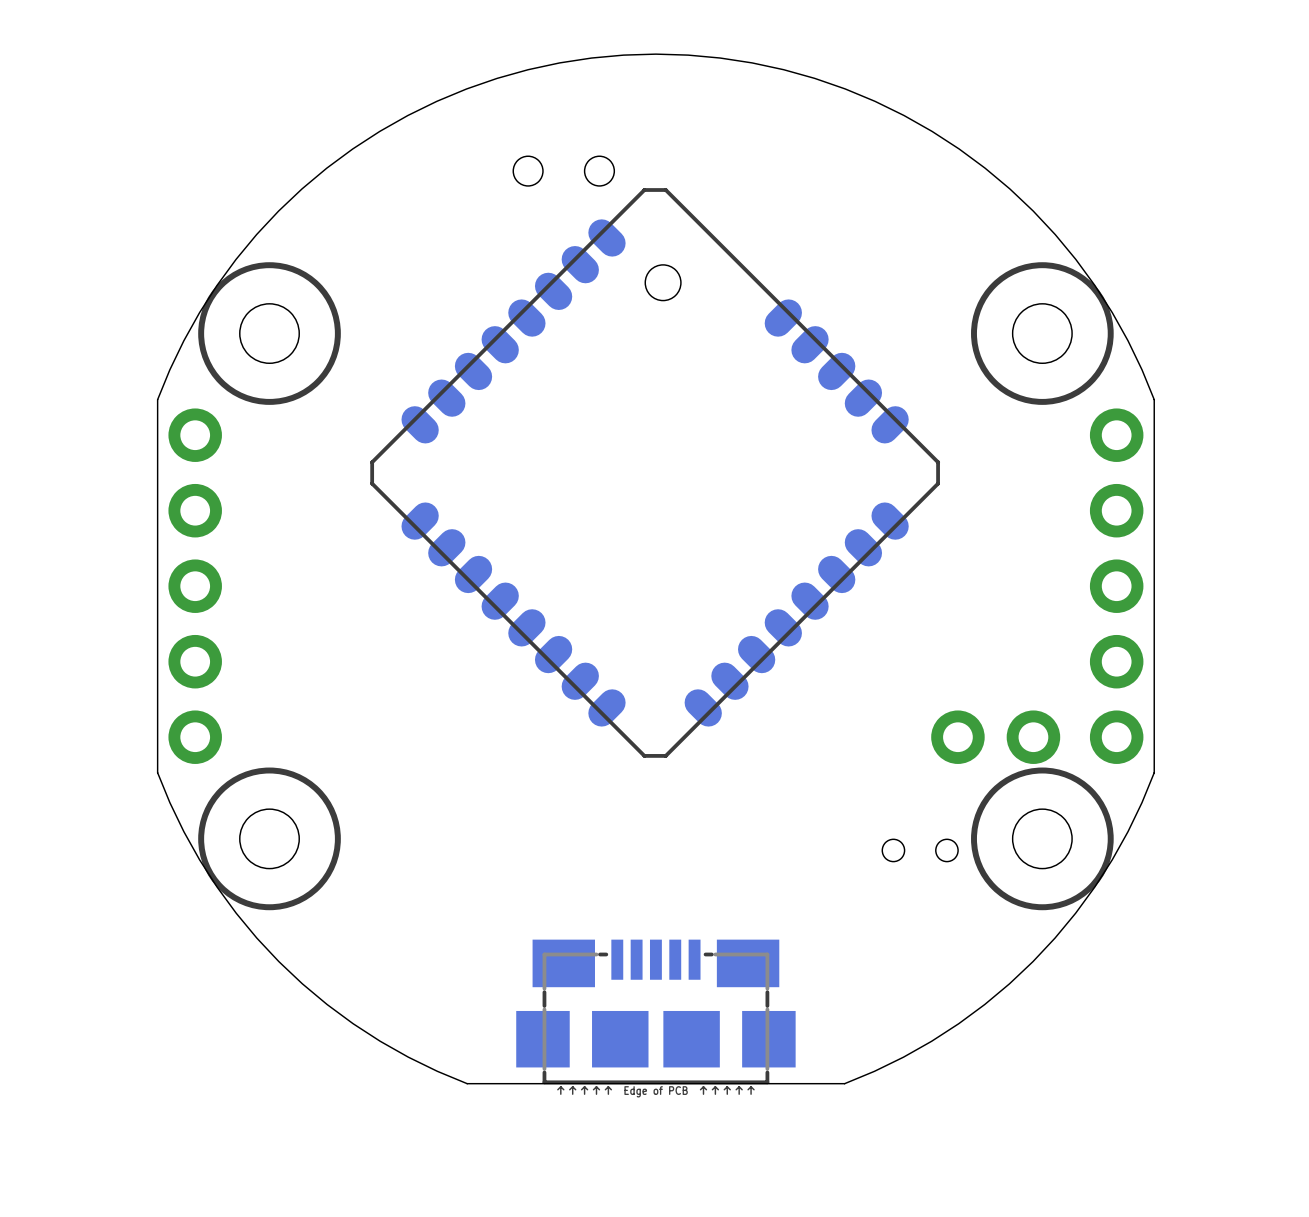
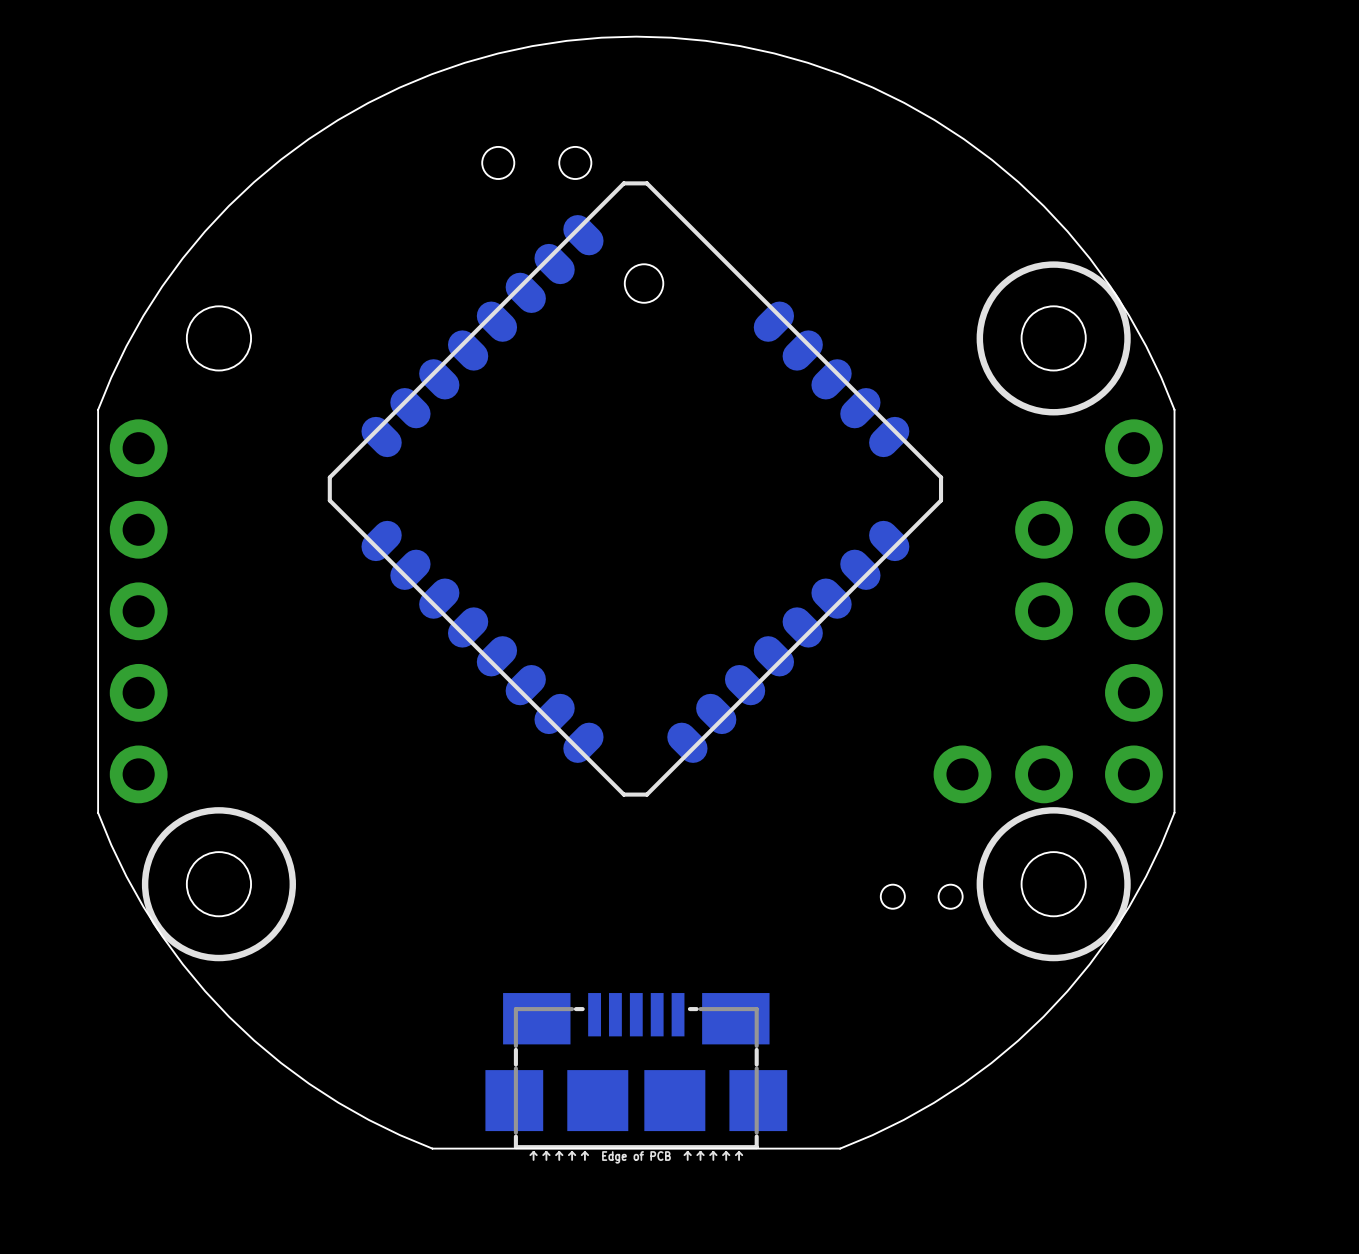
drawing: [198, 262, 341, 405] -> none
part: none -> (1044, 570)

